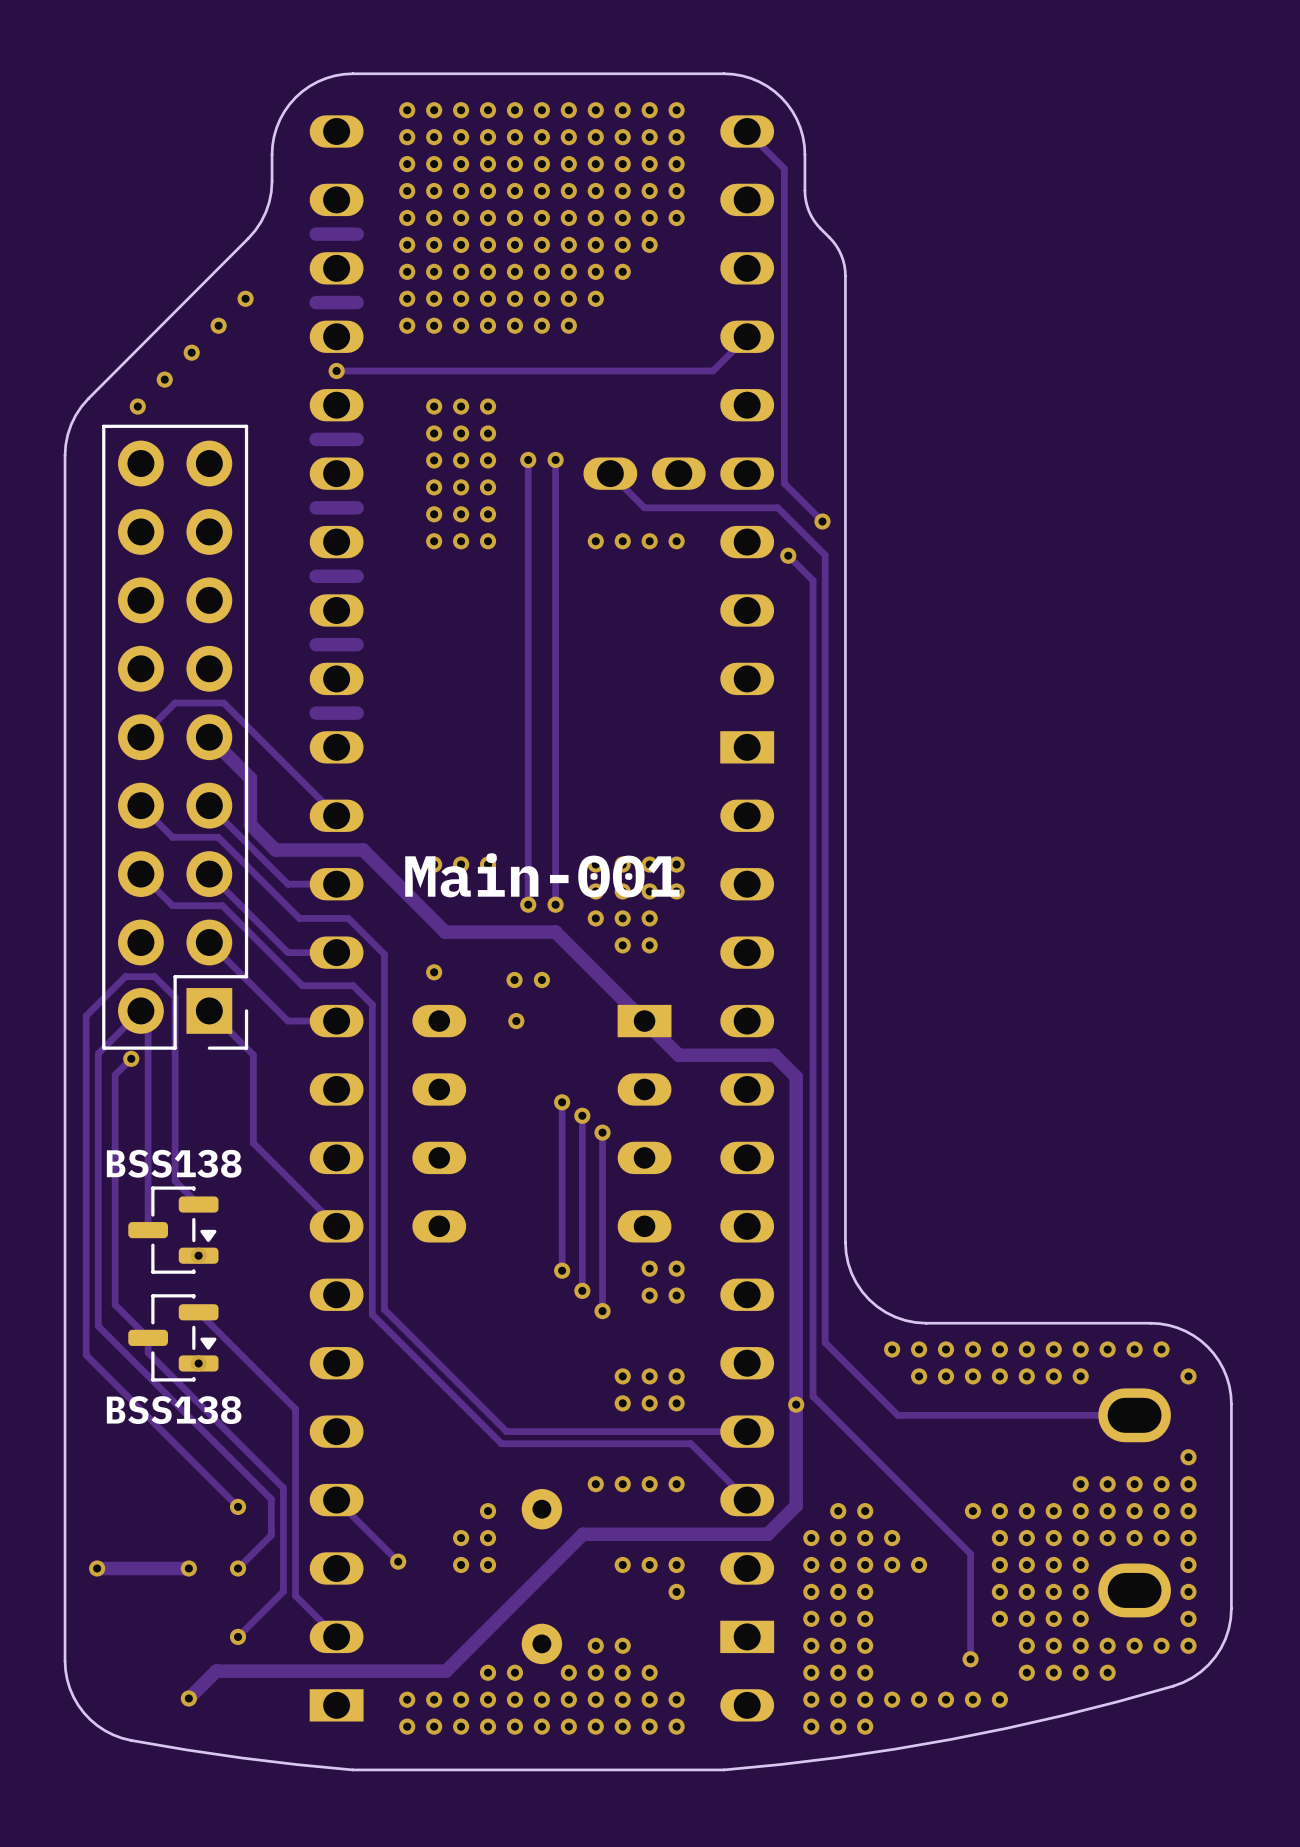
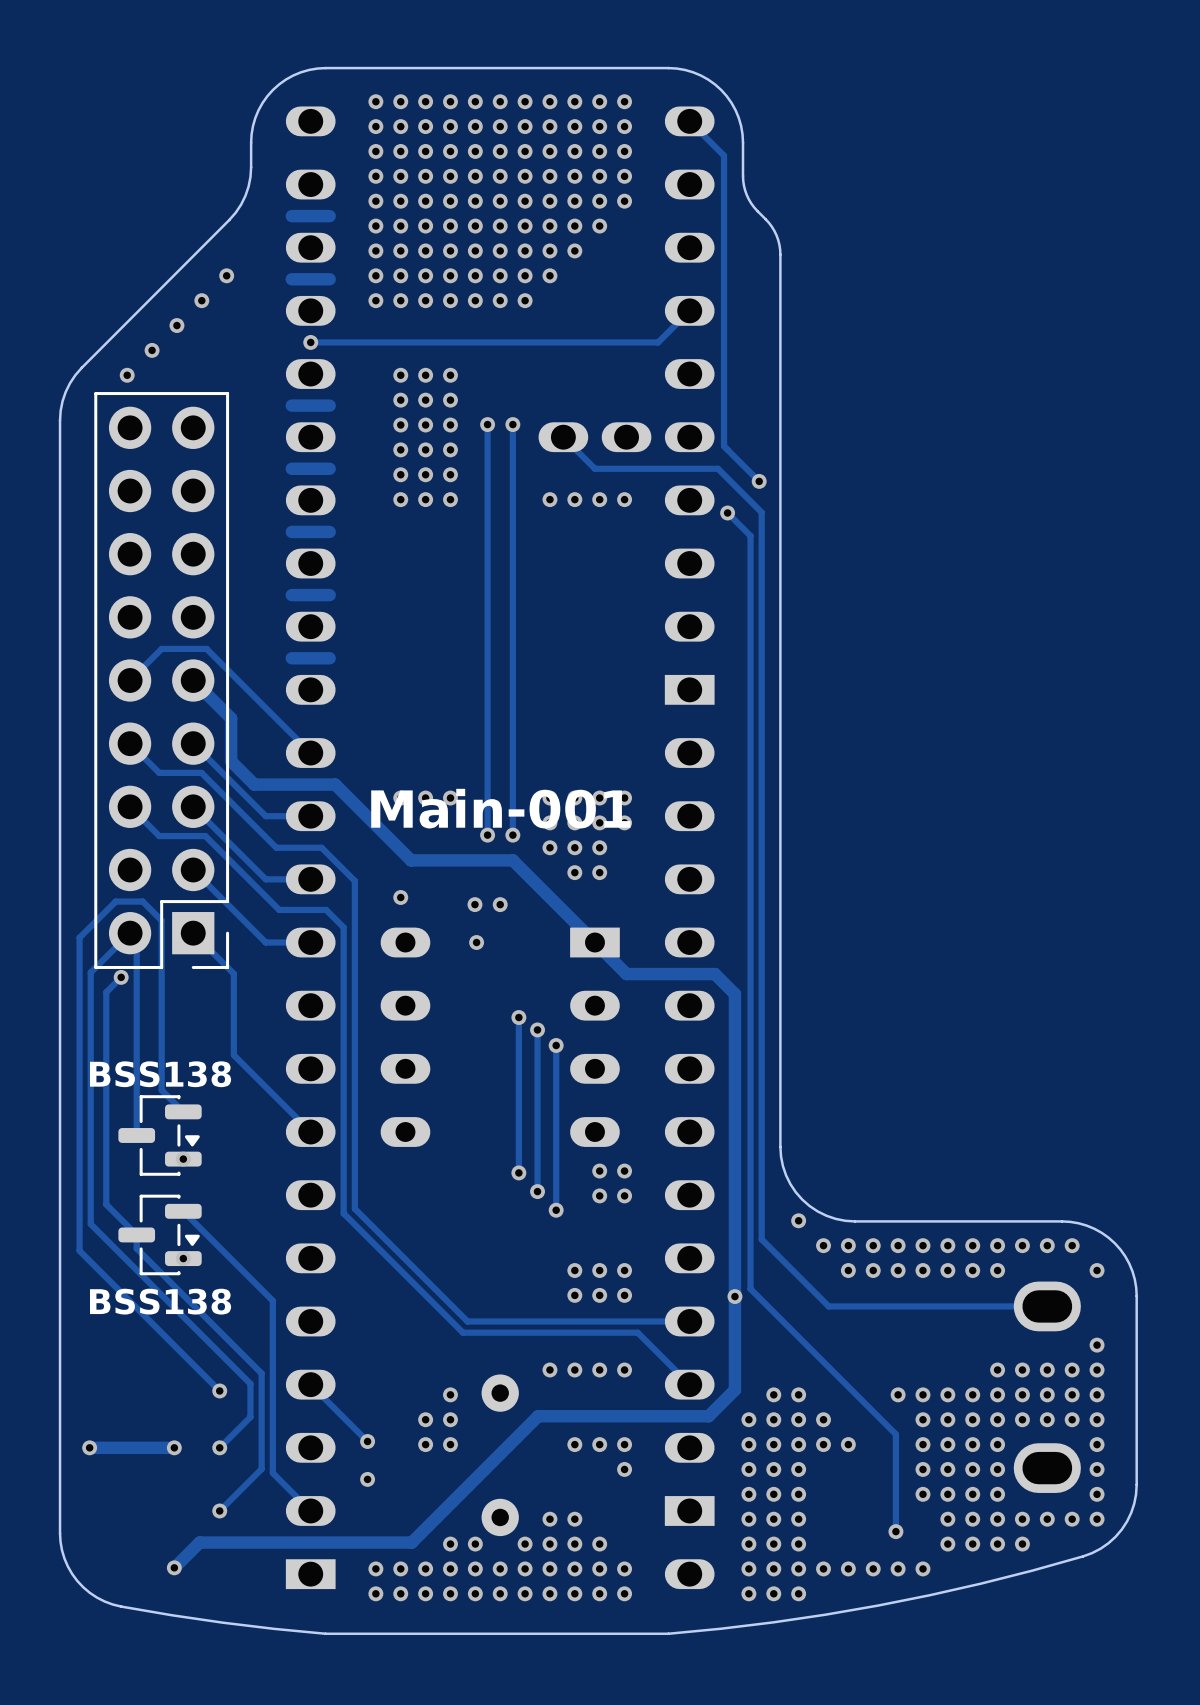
via: none -> (798, 1220)
via: none -> (367, 1479)

